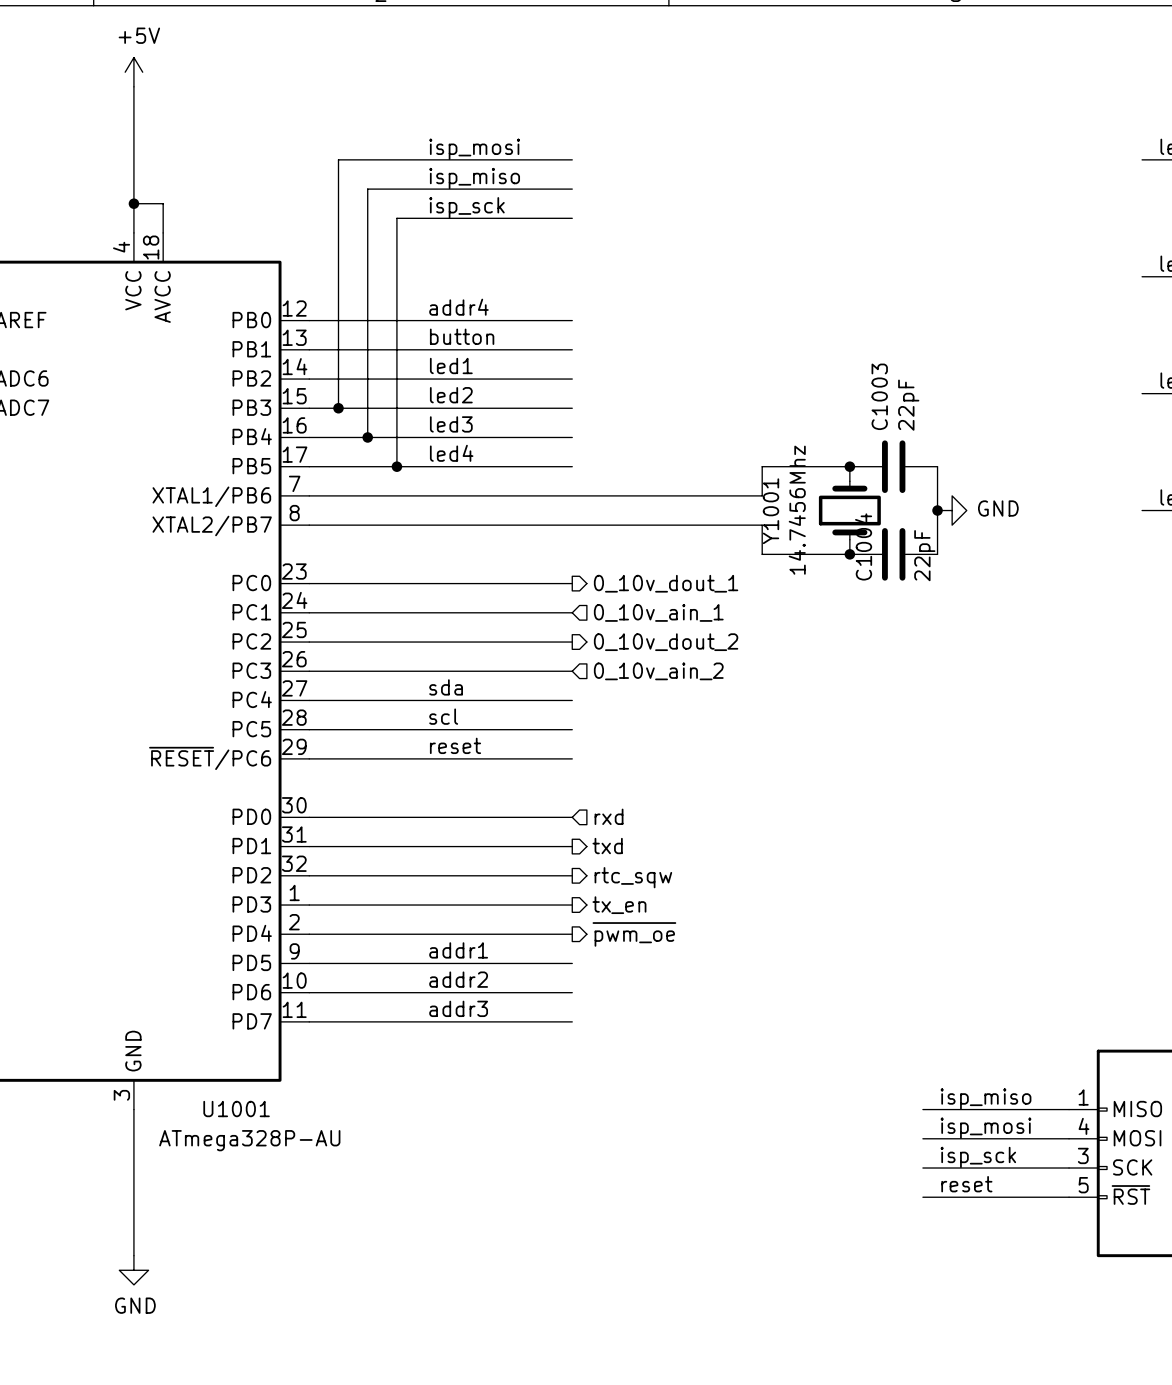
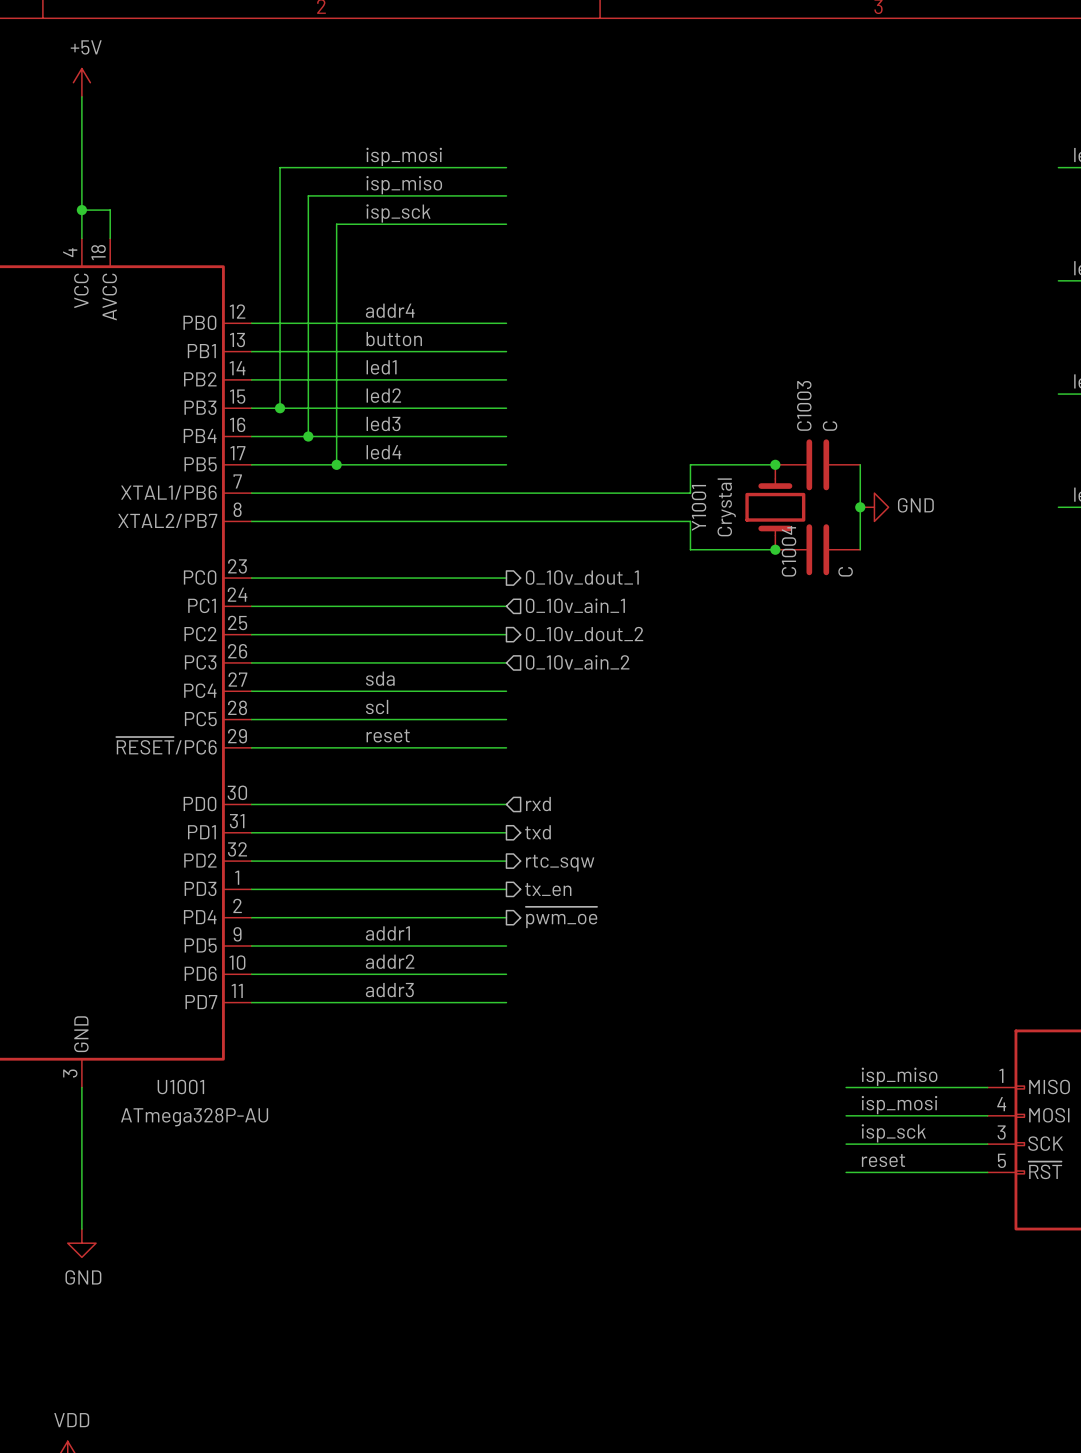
C1003 value: 22pF (908, 405) -> C (830, 426)
Y1001 value: 14.7456Mhz (797, 510) -> Crystal (726, 507)
C1004 value: 22pF (924, 555) -> C (845, 571)

